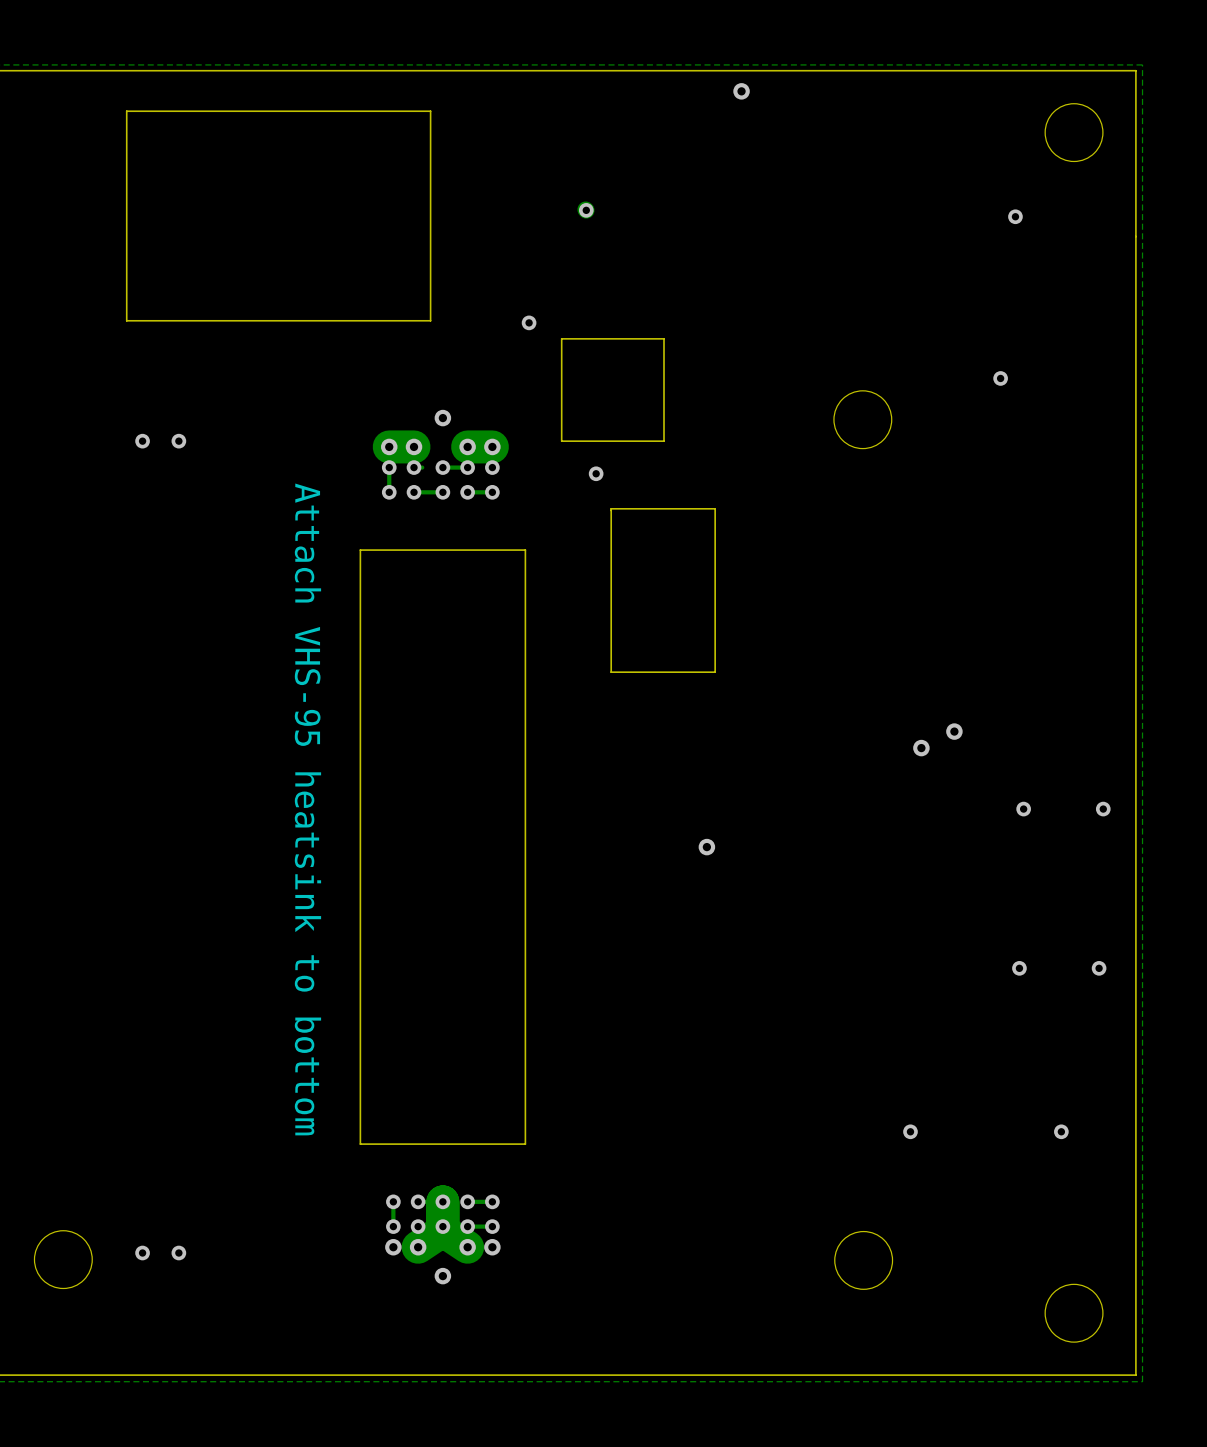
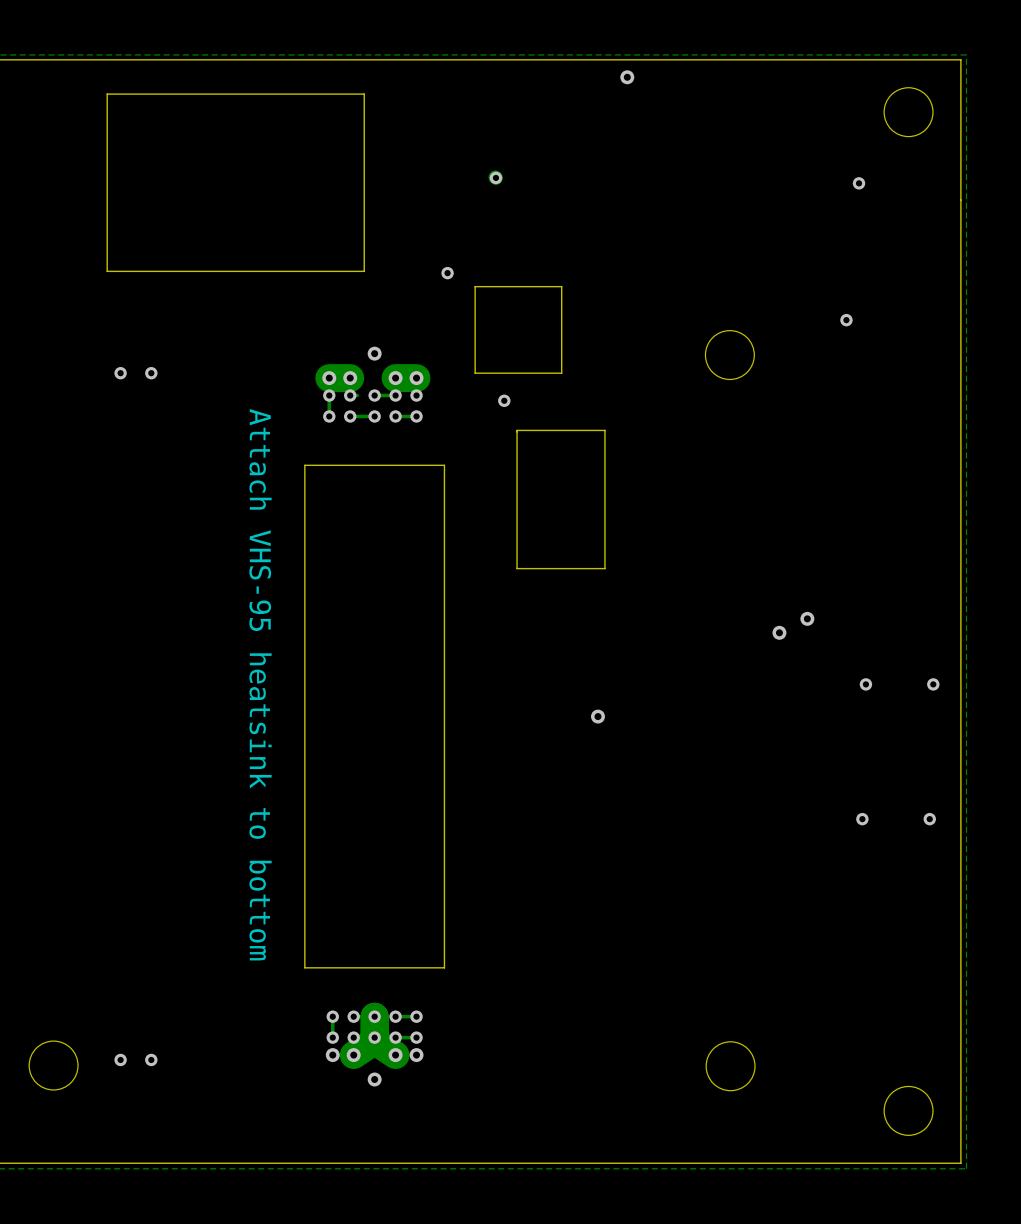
via: (910, 1131) -> none
via: (1061, 1131) -> none

